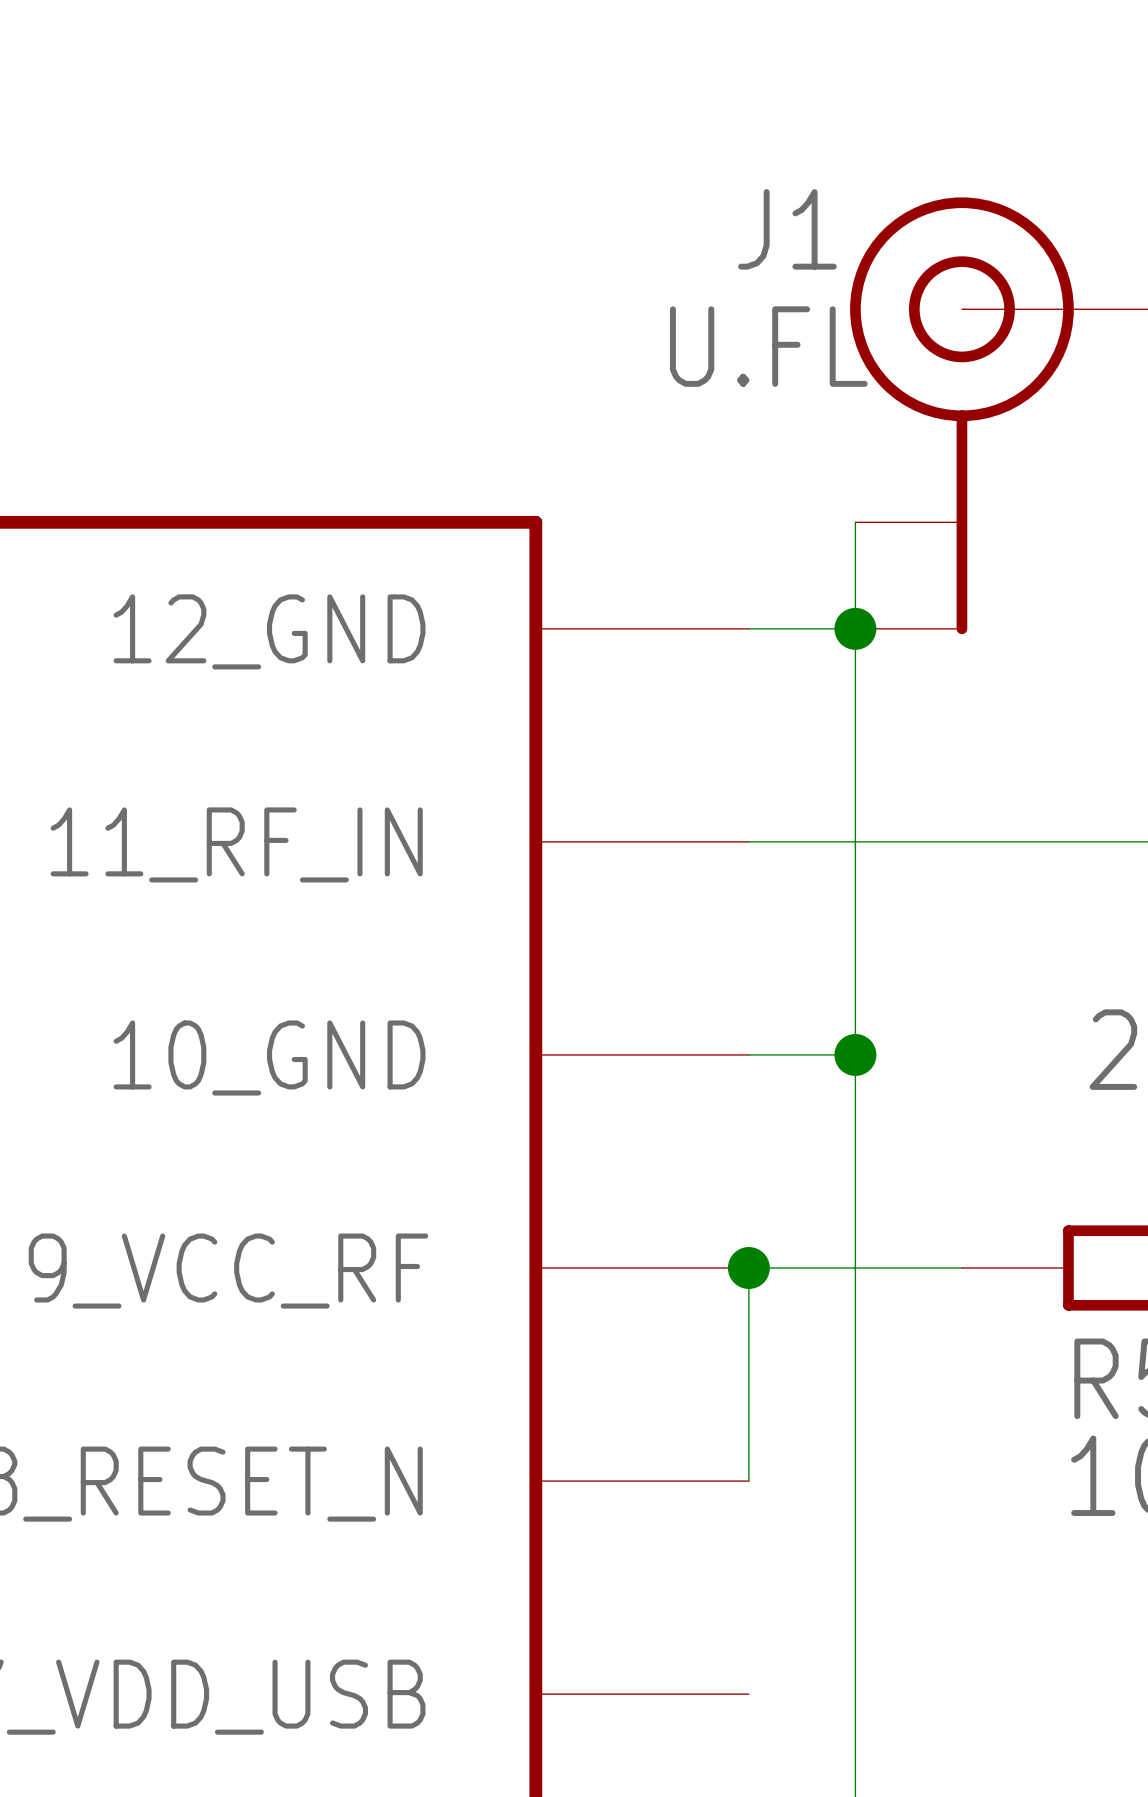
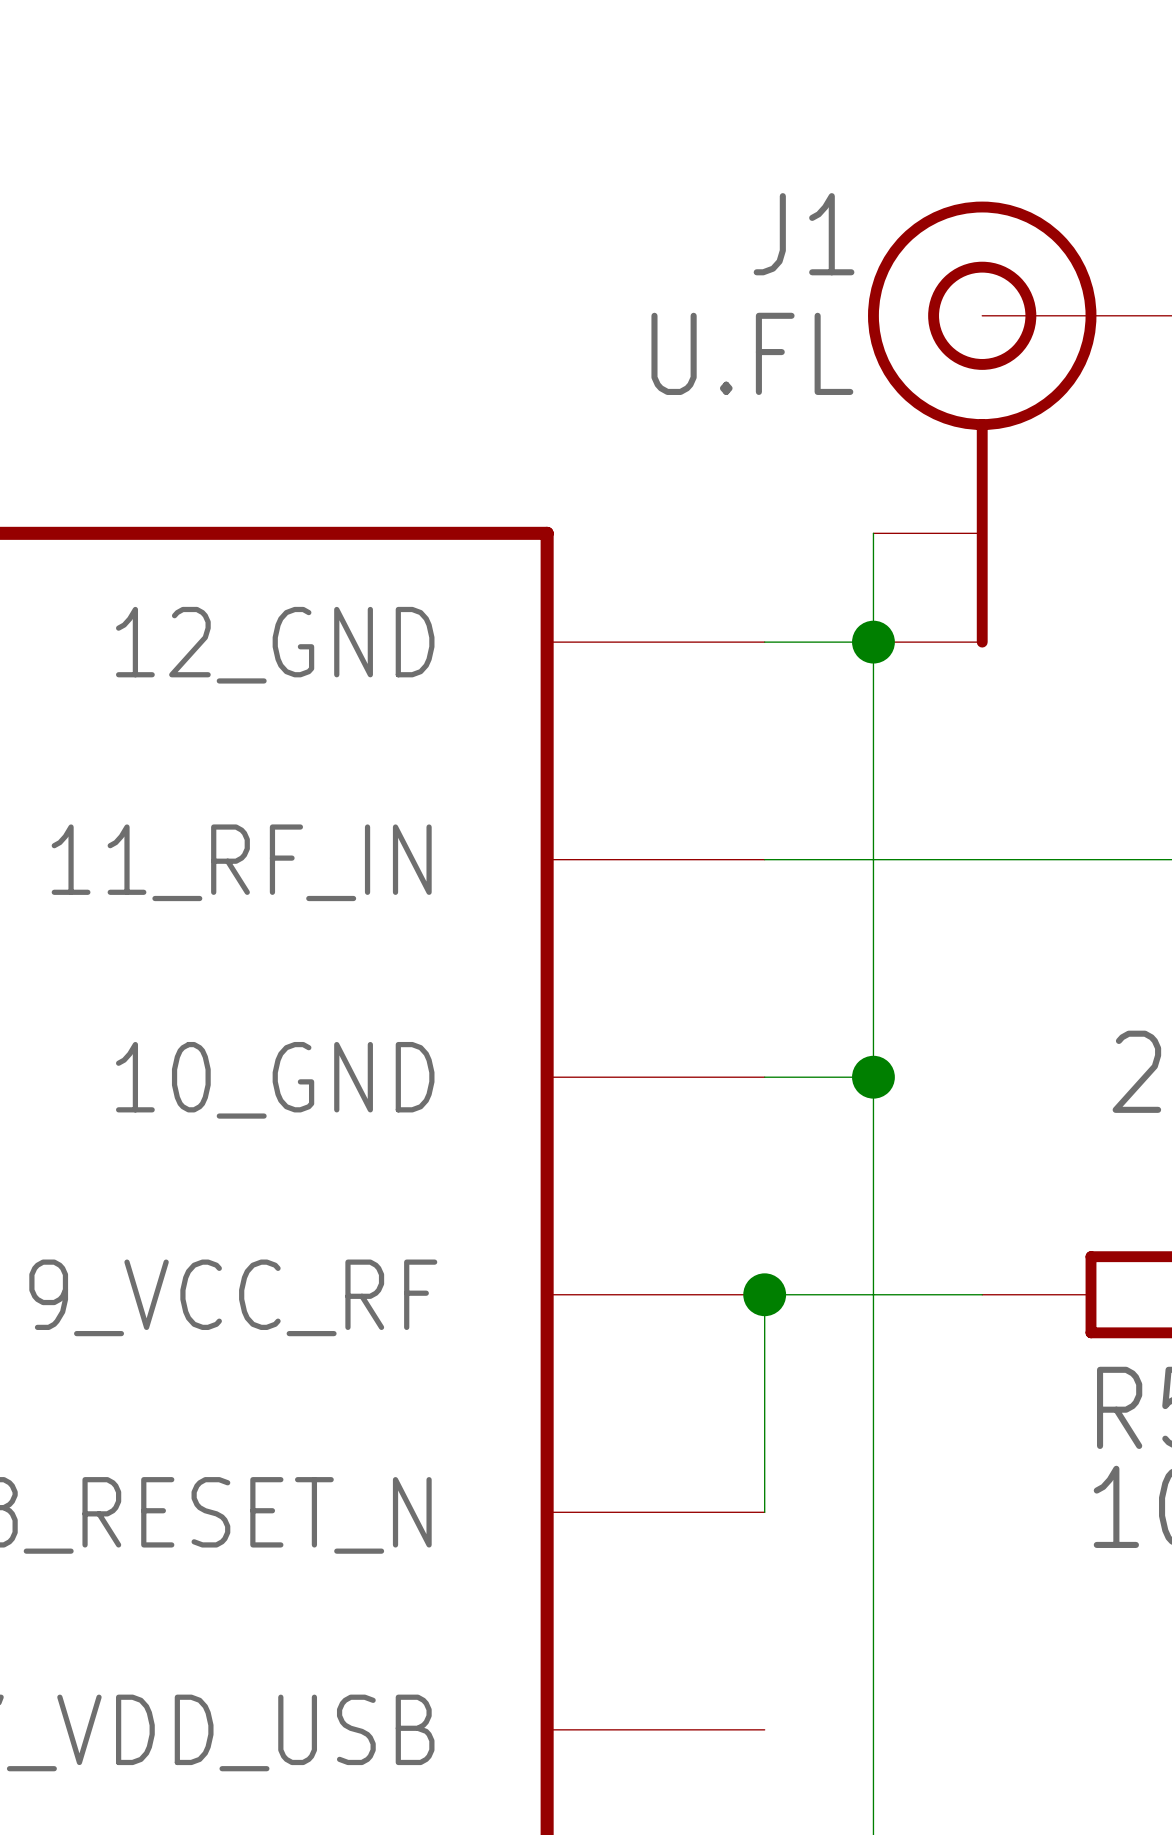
J1 value position: U.FL (768, 346) -> U.FL (752, 353)

